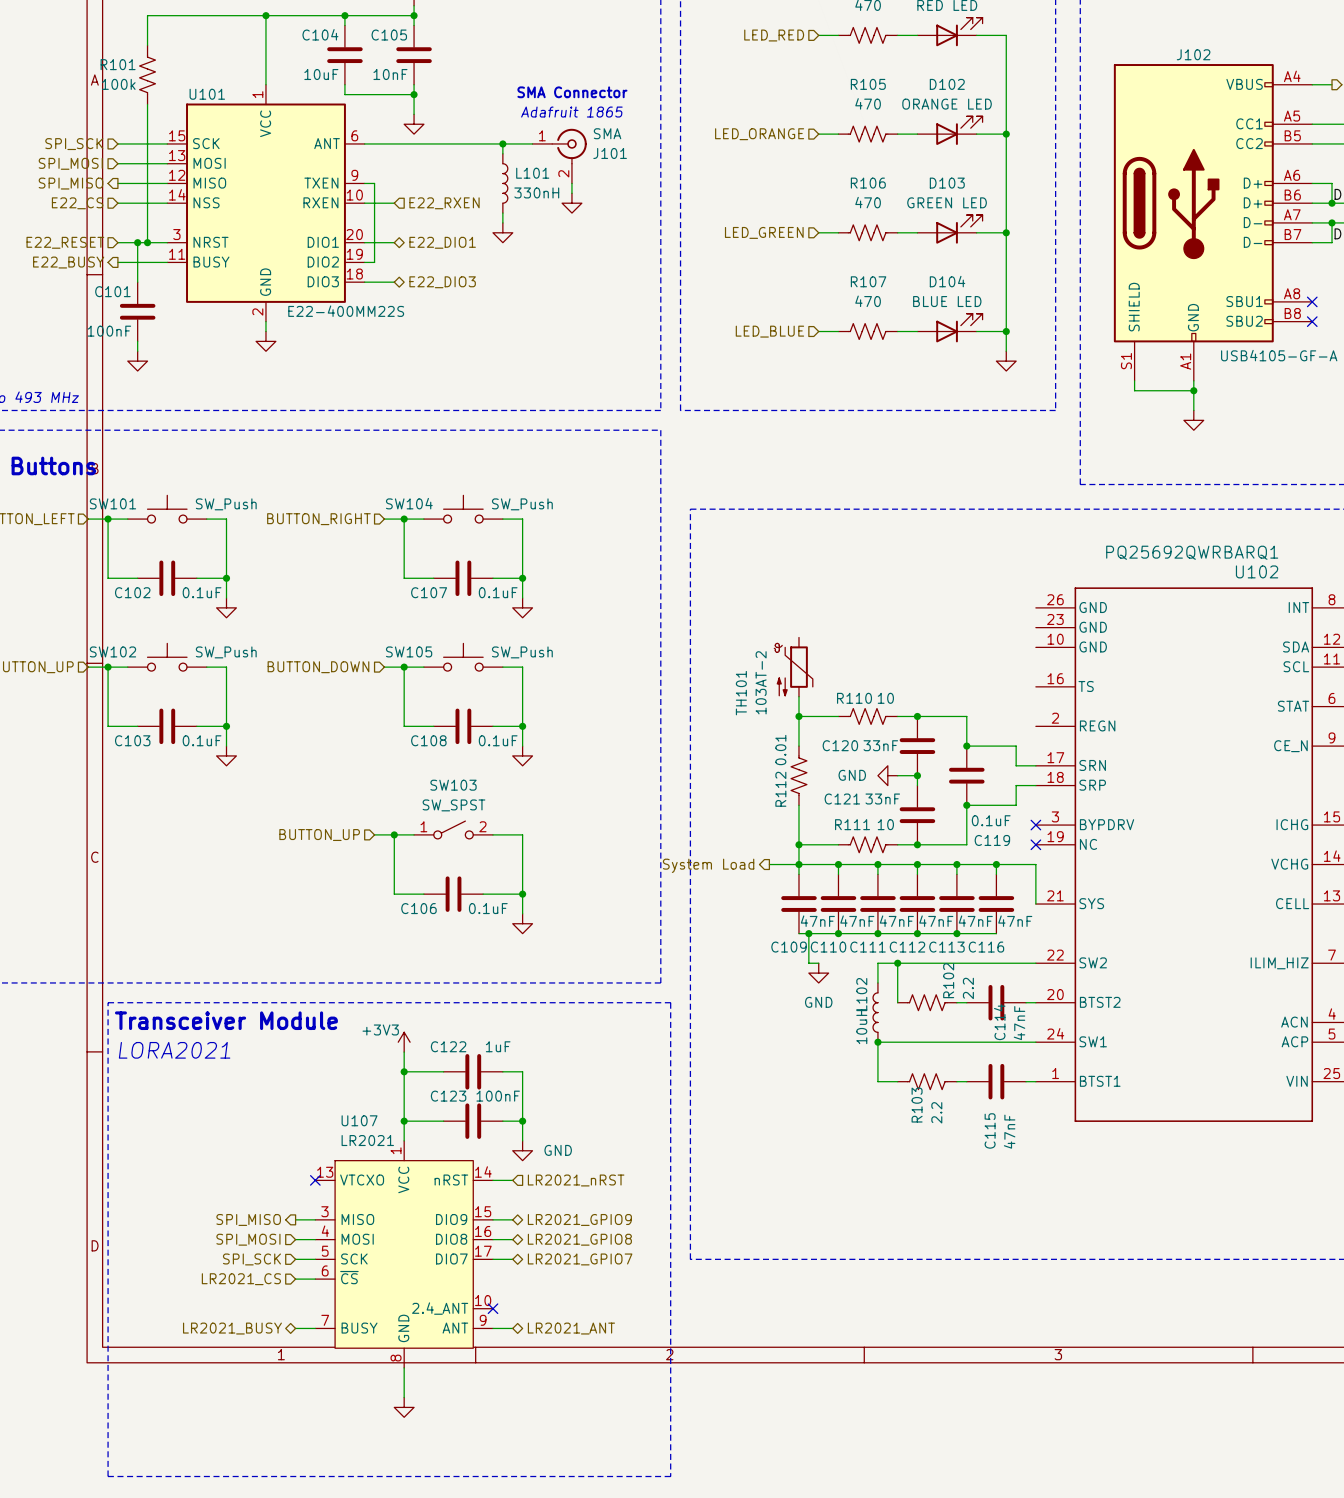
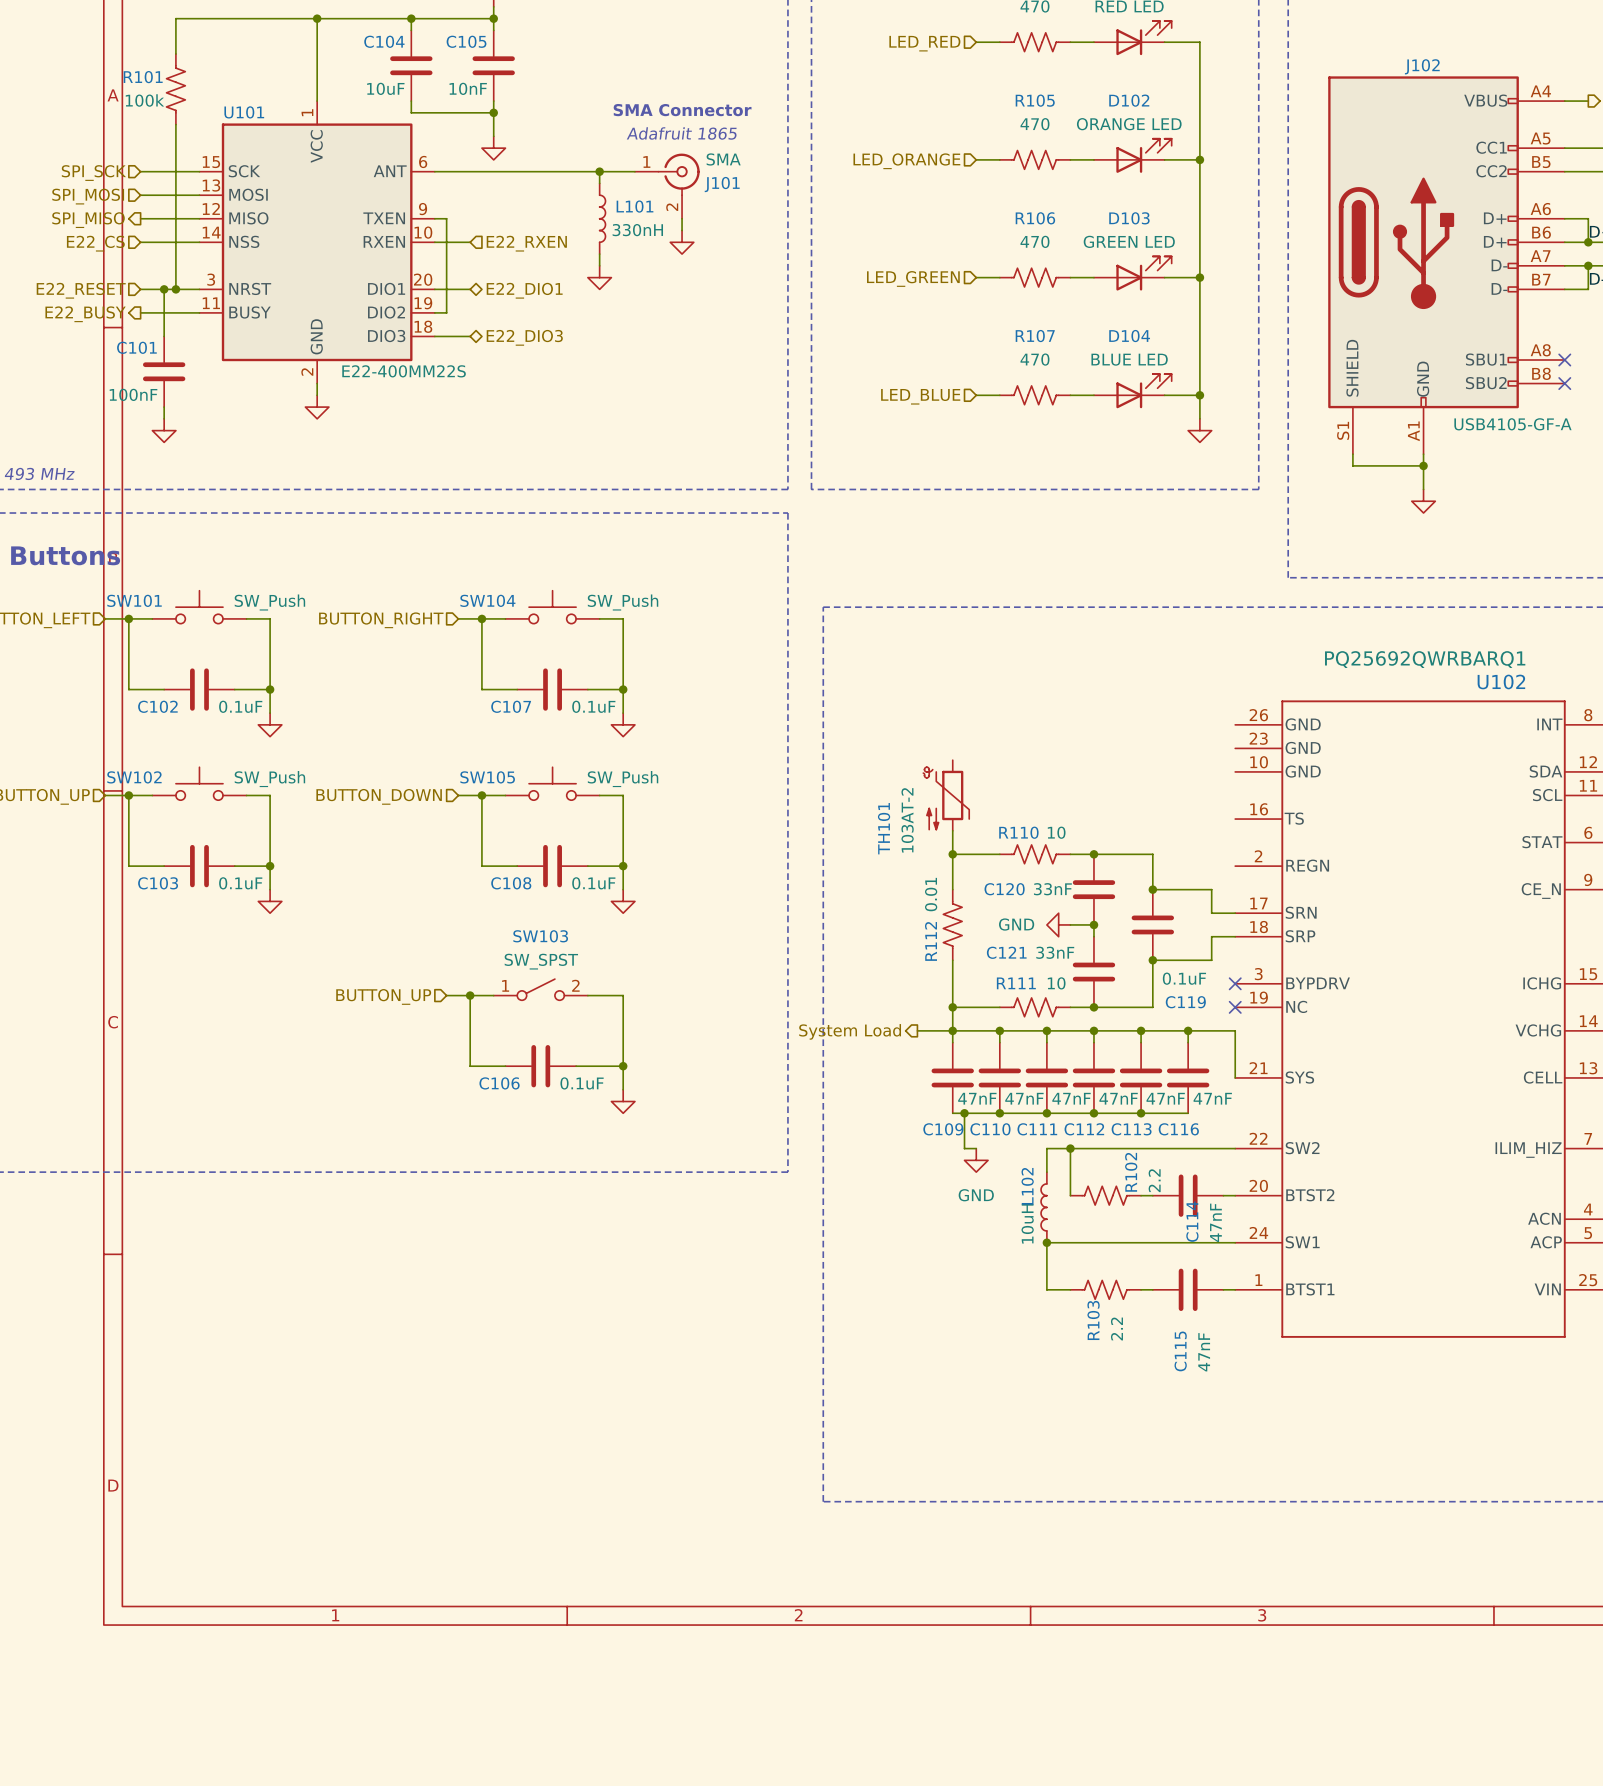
line: (108, 1002) (670, 1002) (670, 1476) (108, 1476) (108, 1002) -> none
text: Transceiver Module (226, 1020) -> none
power symbol: +3V3 (404, 1042) -> none
text: LORA2021 (174, 1050) -> none
wire: (404, 1052) (404, 1140) -> none
wire: (404, 1071) (443, 1071) -> none
junction: (404, 1071) -> none
C122: 1uF (473, 1071) -> none
wire: (502, 1071) (522, 1071) (522, 1140) -> none
wire: (404, 1121) (443, 1121) -> none
junction: (404, 1121) -> none
C123: 100nF (473, 1121) -> none
wire: (502, 1121) (522, 1121) -> none
junction: (522, 1121) -> none
power symbol: GND (522, 1150) -> none
no-connect mark: (315, 1180) -> none
wire: (493, 1180) (512, 1180) -> none
hierarchical label: LR2021_nRST (576, 1180) -> none
hierarchical label: SPI_MISO (248, 1219) -> none
wire: (295, 1219) (315, 1219) -> none
wire: (493, 1219) (512, 1219) -> none
hierarchical label: LR2021_GPIO9 (579, 1219) -> none
hierarchical label: SPI_MOSI (248, 1239) -> none
wire: (295, 1239) (315, 1239) -> none
wire: (493, 1239) (512, 1239) -> none
hierarchical label: LR2021_GPIO8 (579, 1239) -> none
U107: LR2021 (404, 1254) -> none
hierarchical label: SPI_SCK (251, 1259) -> none
wire: (295, 1259) (315, 1259) -> none
wire: (493, 1259) (512, 1259) -> none
hierarchical label: LR2021_GPIO7 (580, 1259) -> none
hierarchical label: LR2021_CS (241, 1279) -> none
wire: (295, 1279) (315, 1279) -> none
no-connect mark: (493, 1308) -> none
hierarchical label: LR2021_BUSY (232, 1328) -> none
wire: (295, 1328) (315, 1328) -> none
wire: (493, 1328) (512, 1328) -> none
hierarchical label: LR2021_ANT (571, 1328) -> none
wire: (404, 1367) (404, 1397) -> none
power symbol: (404, 1407) -> none

